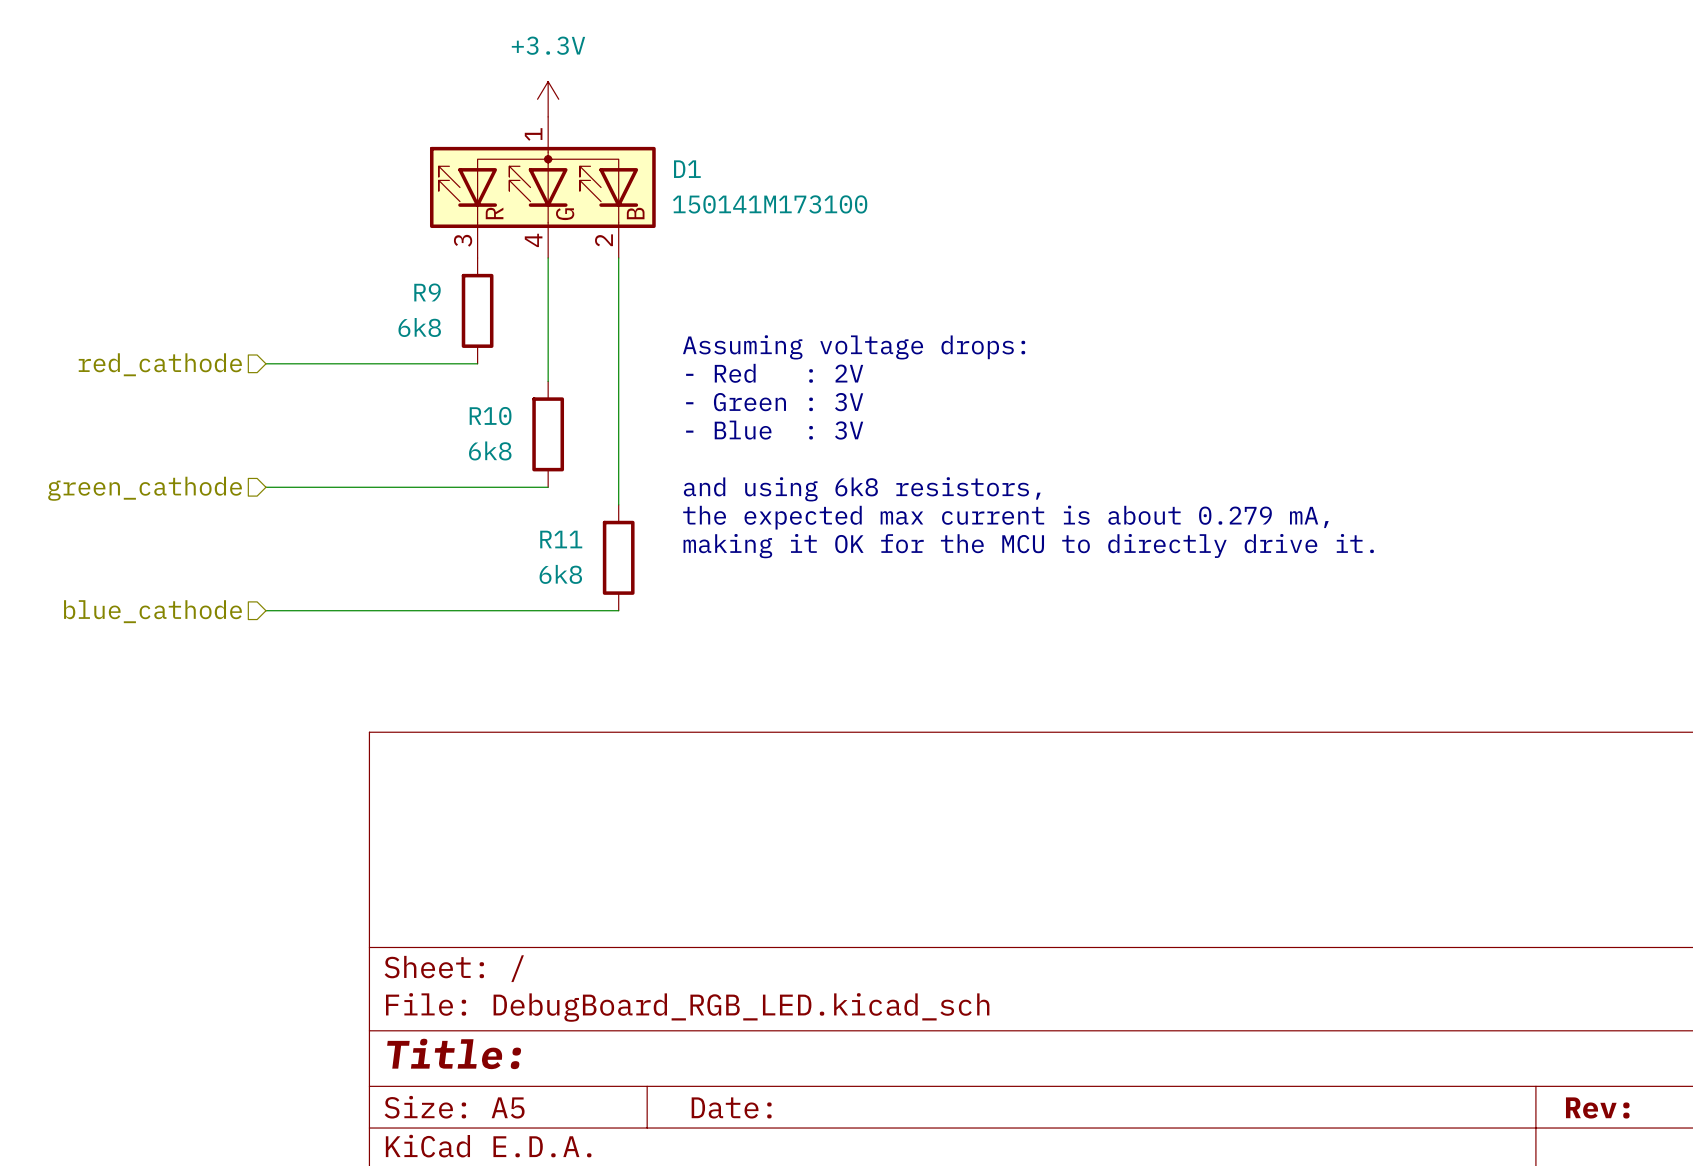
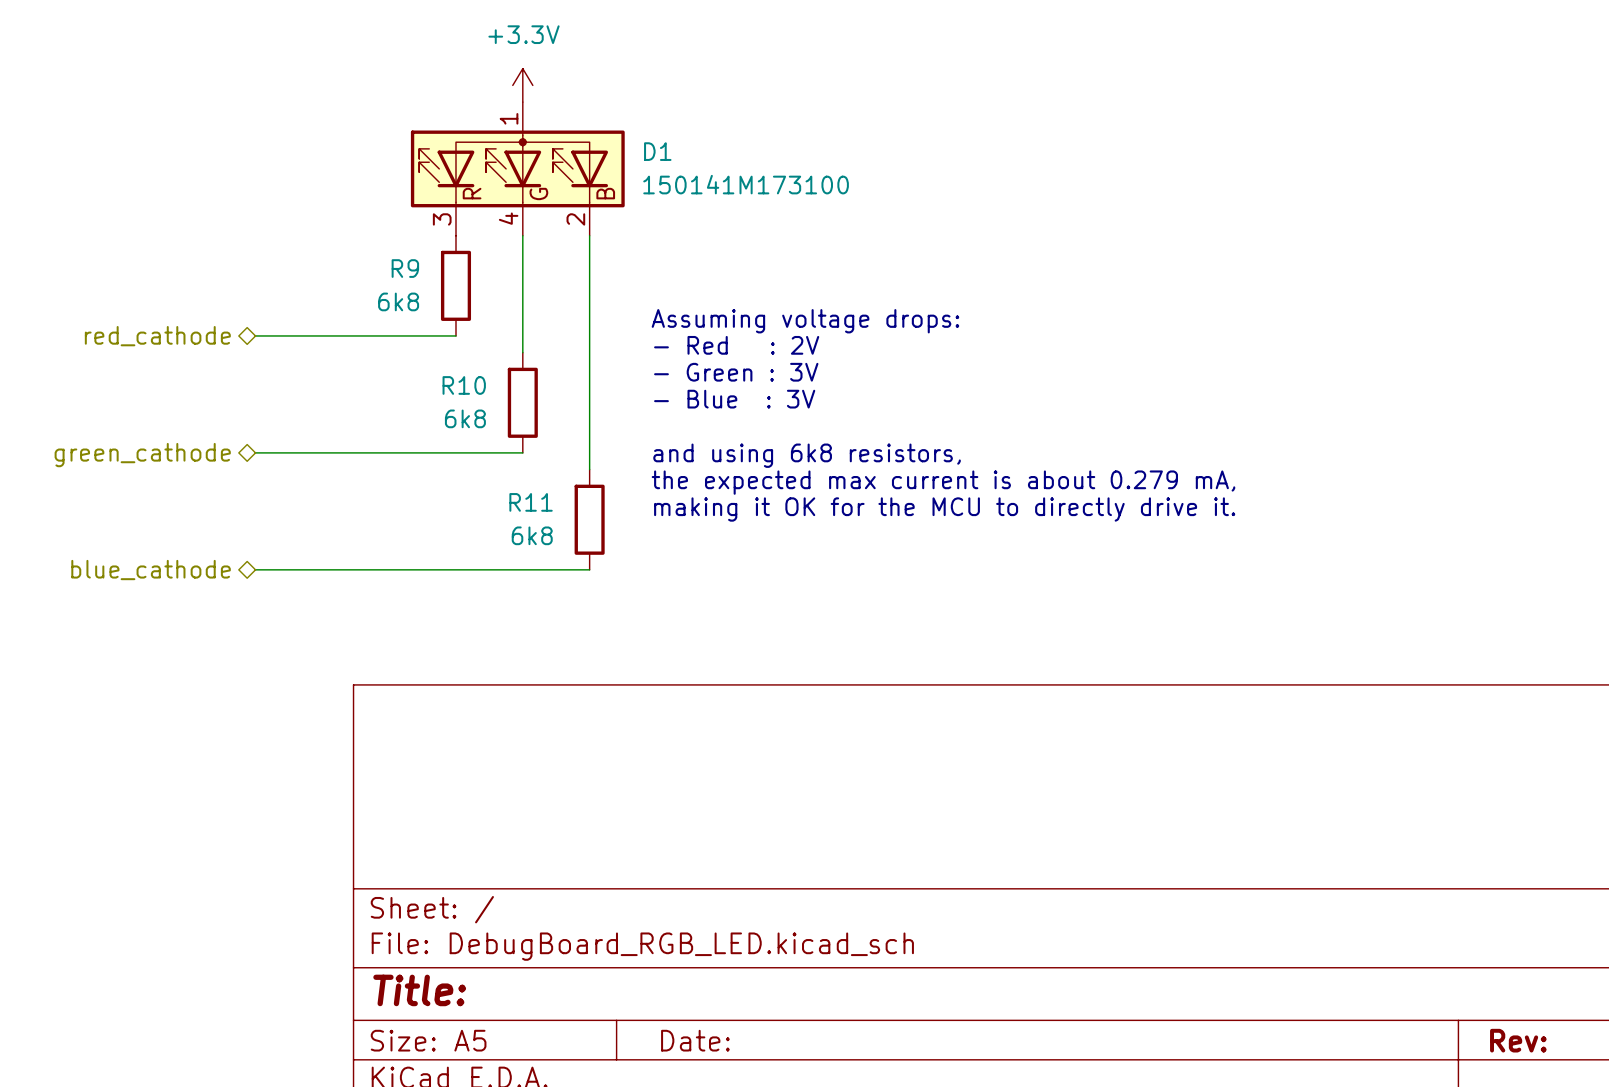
hierarchical label shape: input (160, 364) -> bidirectional (157, 336)
hierarchical label shape: input (145, 488) -> bidirectional (142, 455)
hierarchical label shape: input (152, 611) -> bidirectional (151, 570)

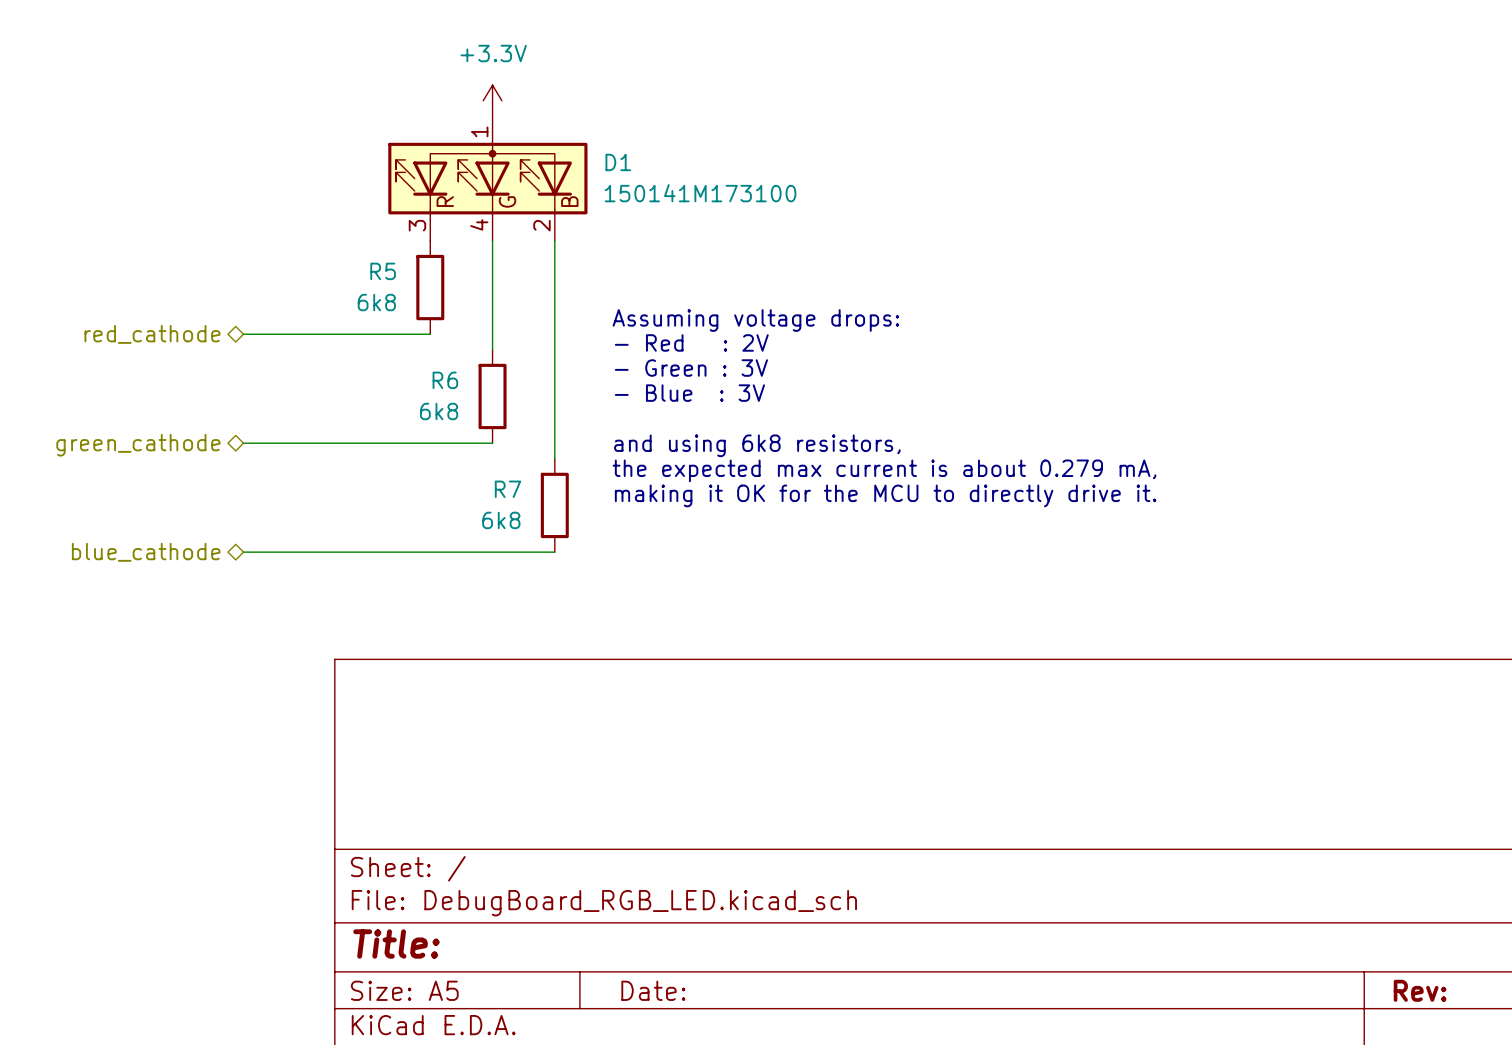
R9 name: R9 (405, 268) -> R5 (383, 271)
R10 name: R10 (464, 385) -> R6 (445, 380)
R11 name: R11 (531, 502) -> R7 (507, 489)

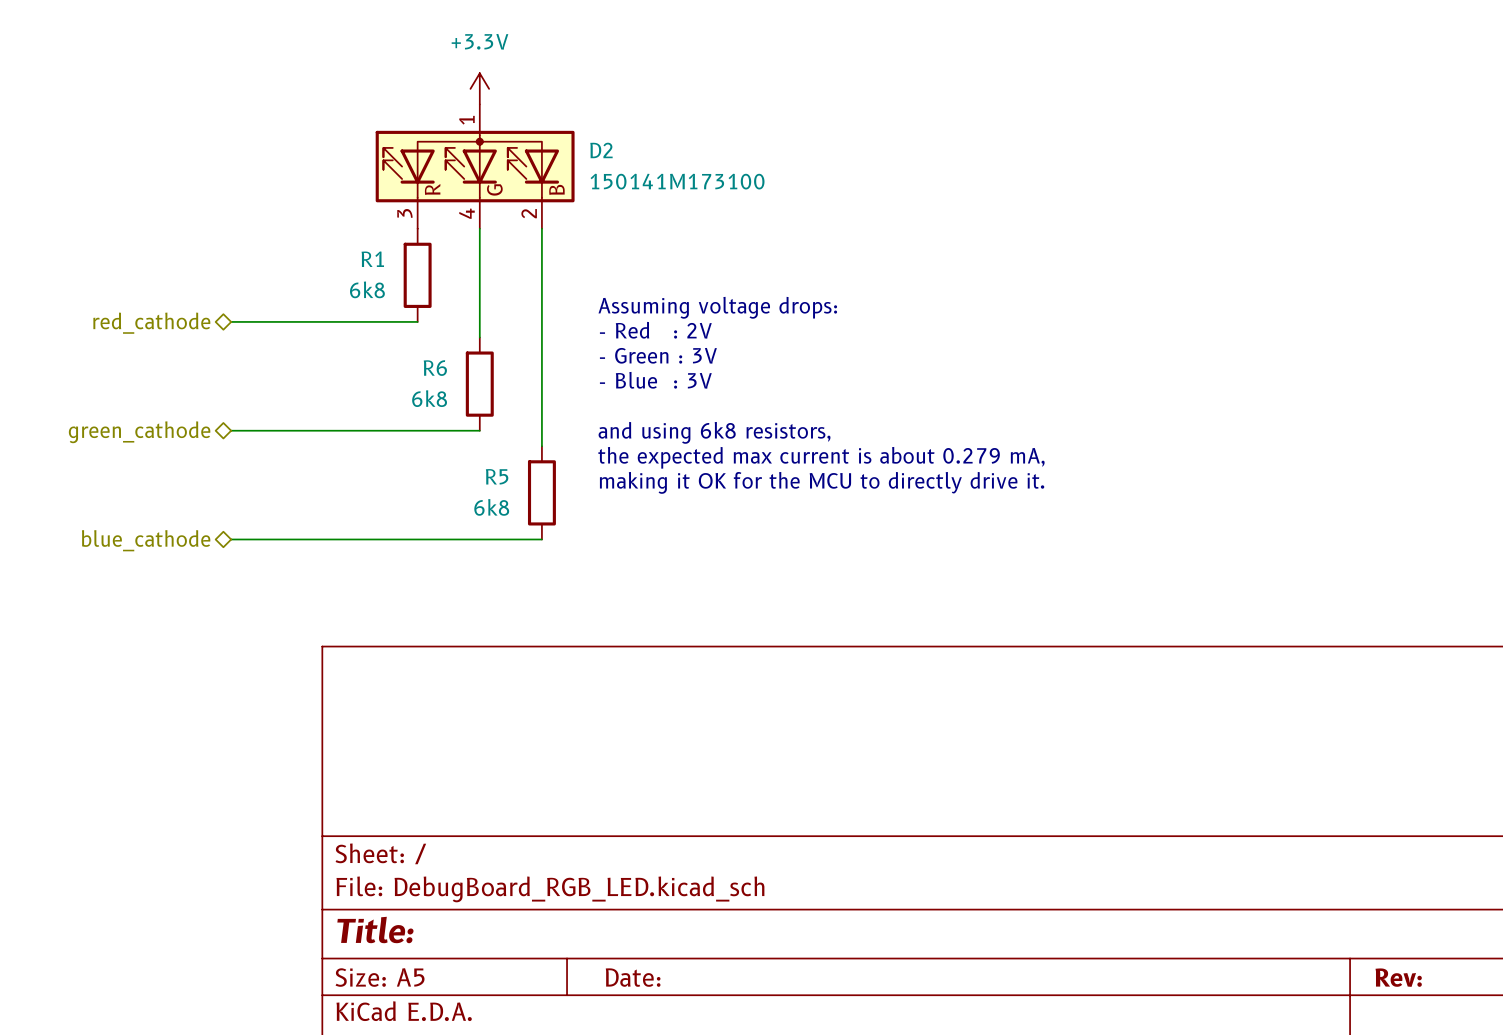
D1 name: D1 (618, 162) -> D2 (601, 150)
R5 name: R5 (383, 271) -> R1 (372, 259)
R7 name: R7 (507, 489) -> R5 (497, 476)

